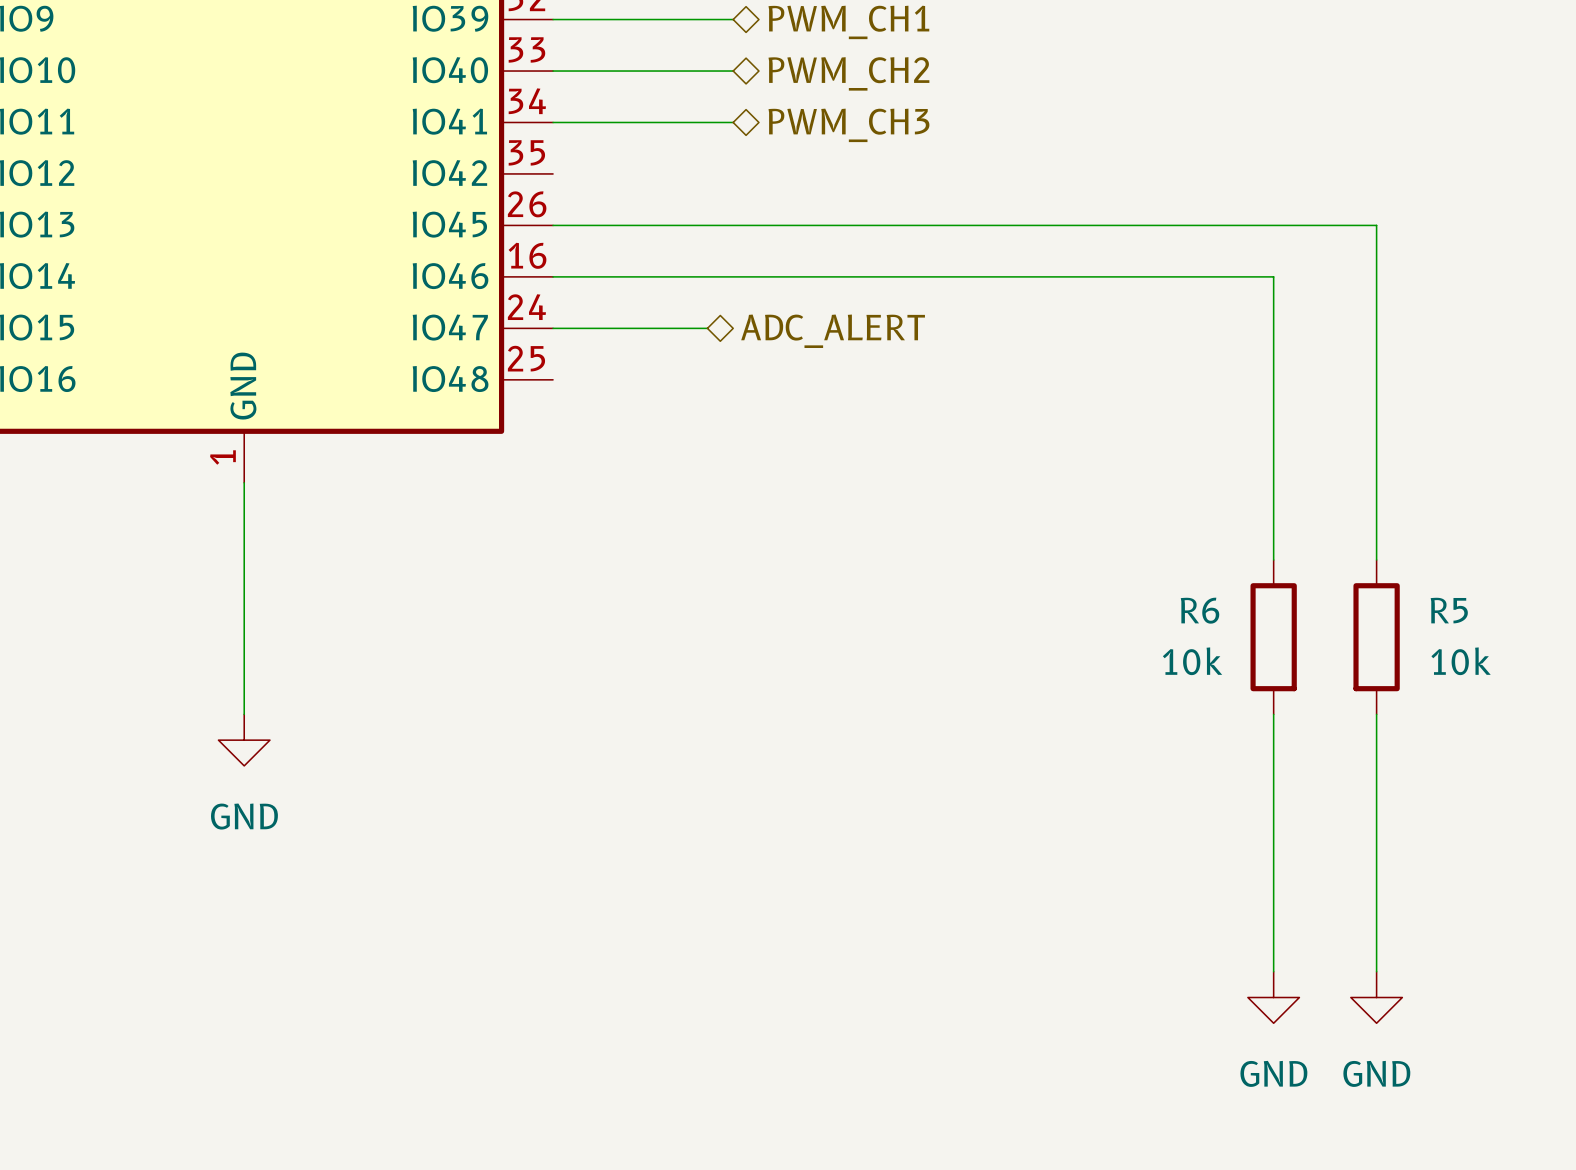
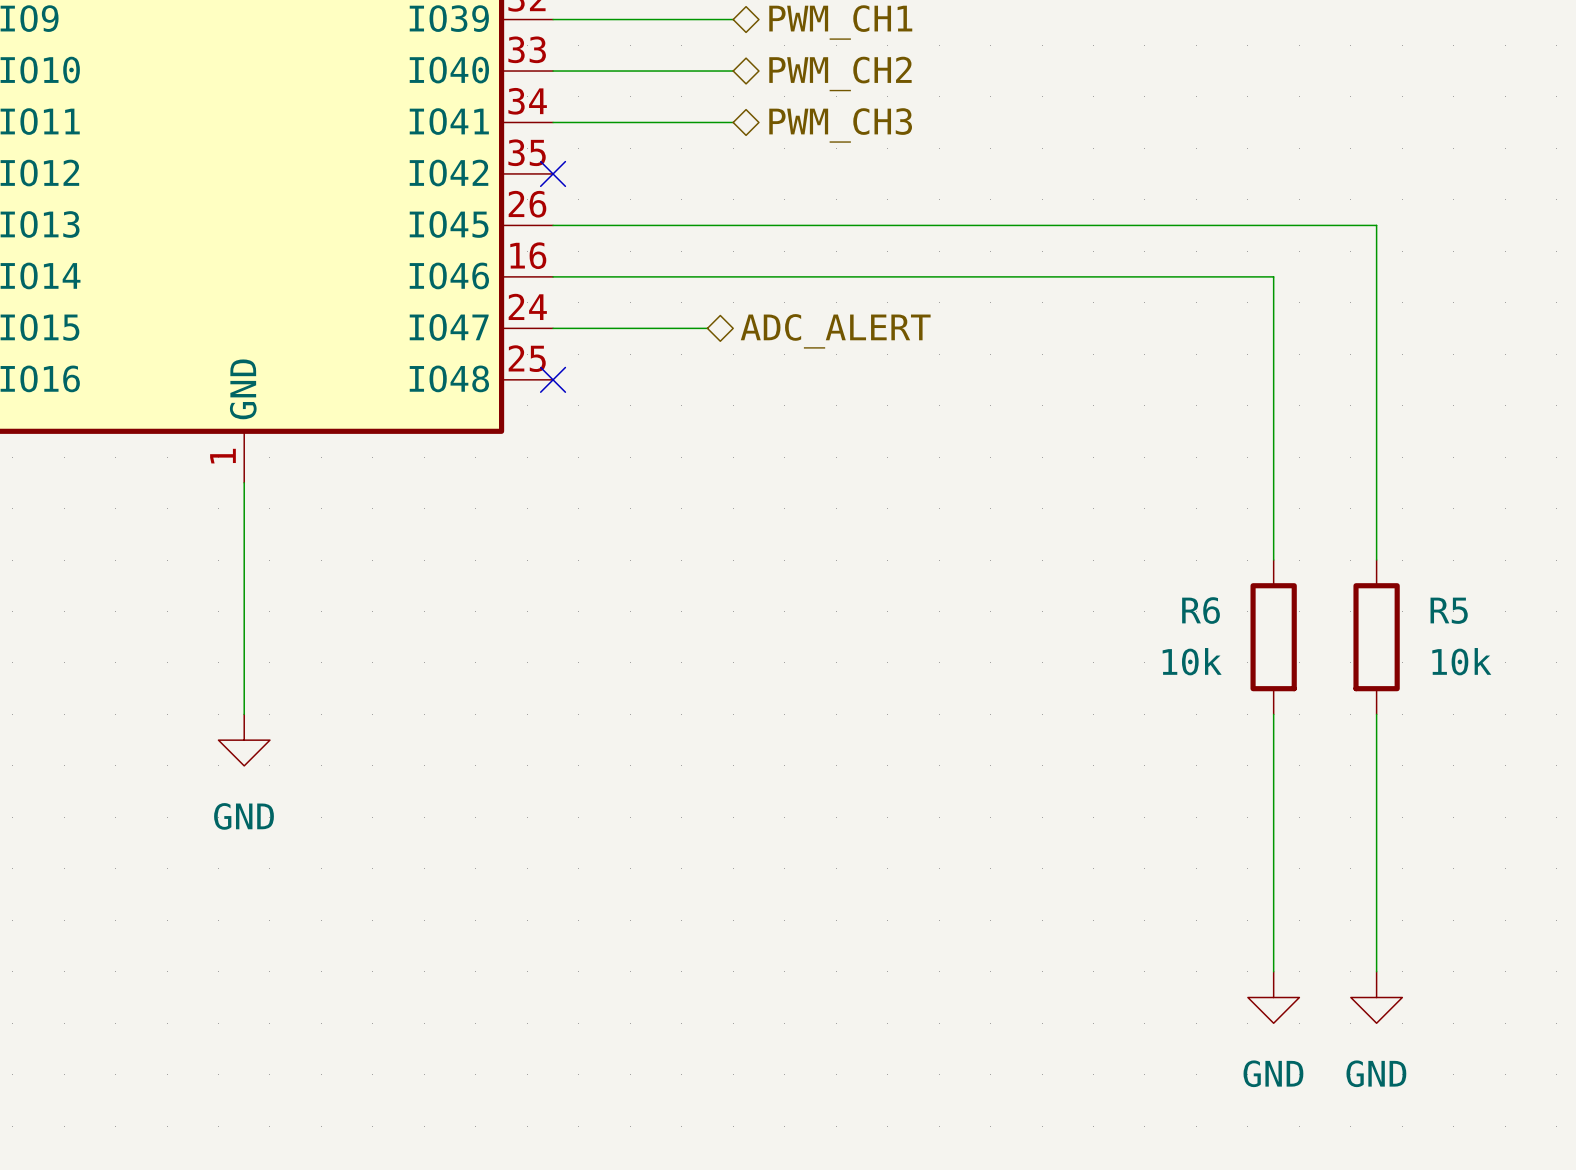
no-connect mark: none -> (553, 173)
no-connect mark: none -> (553, 379)

